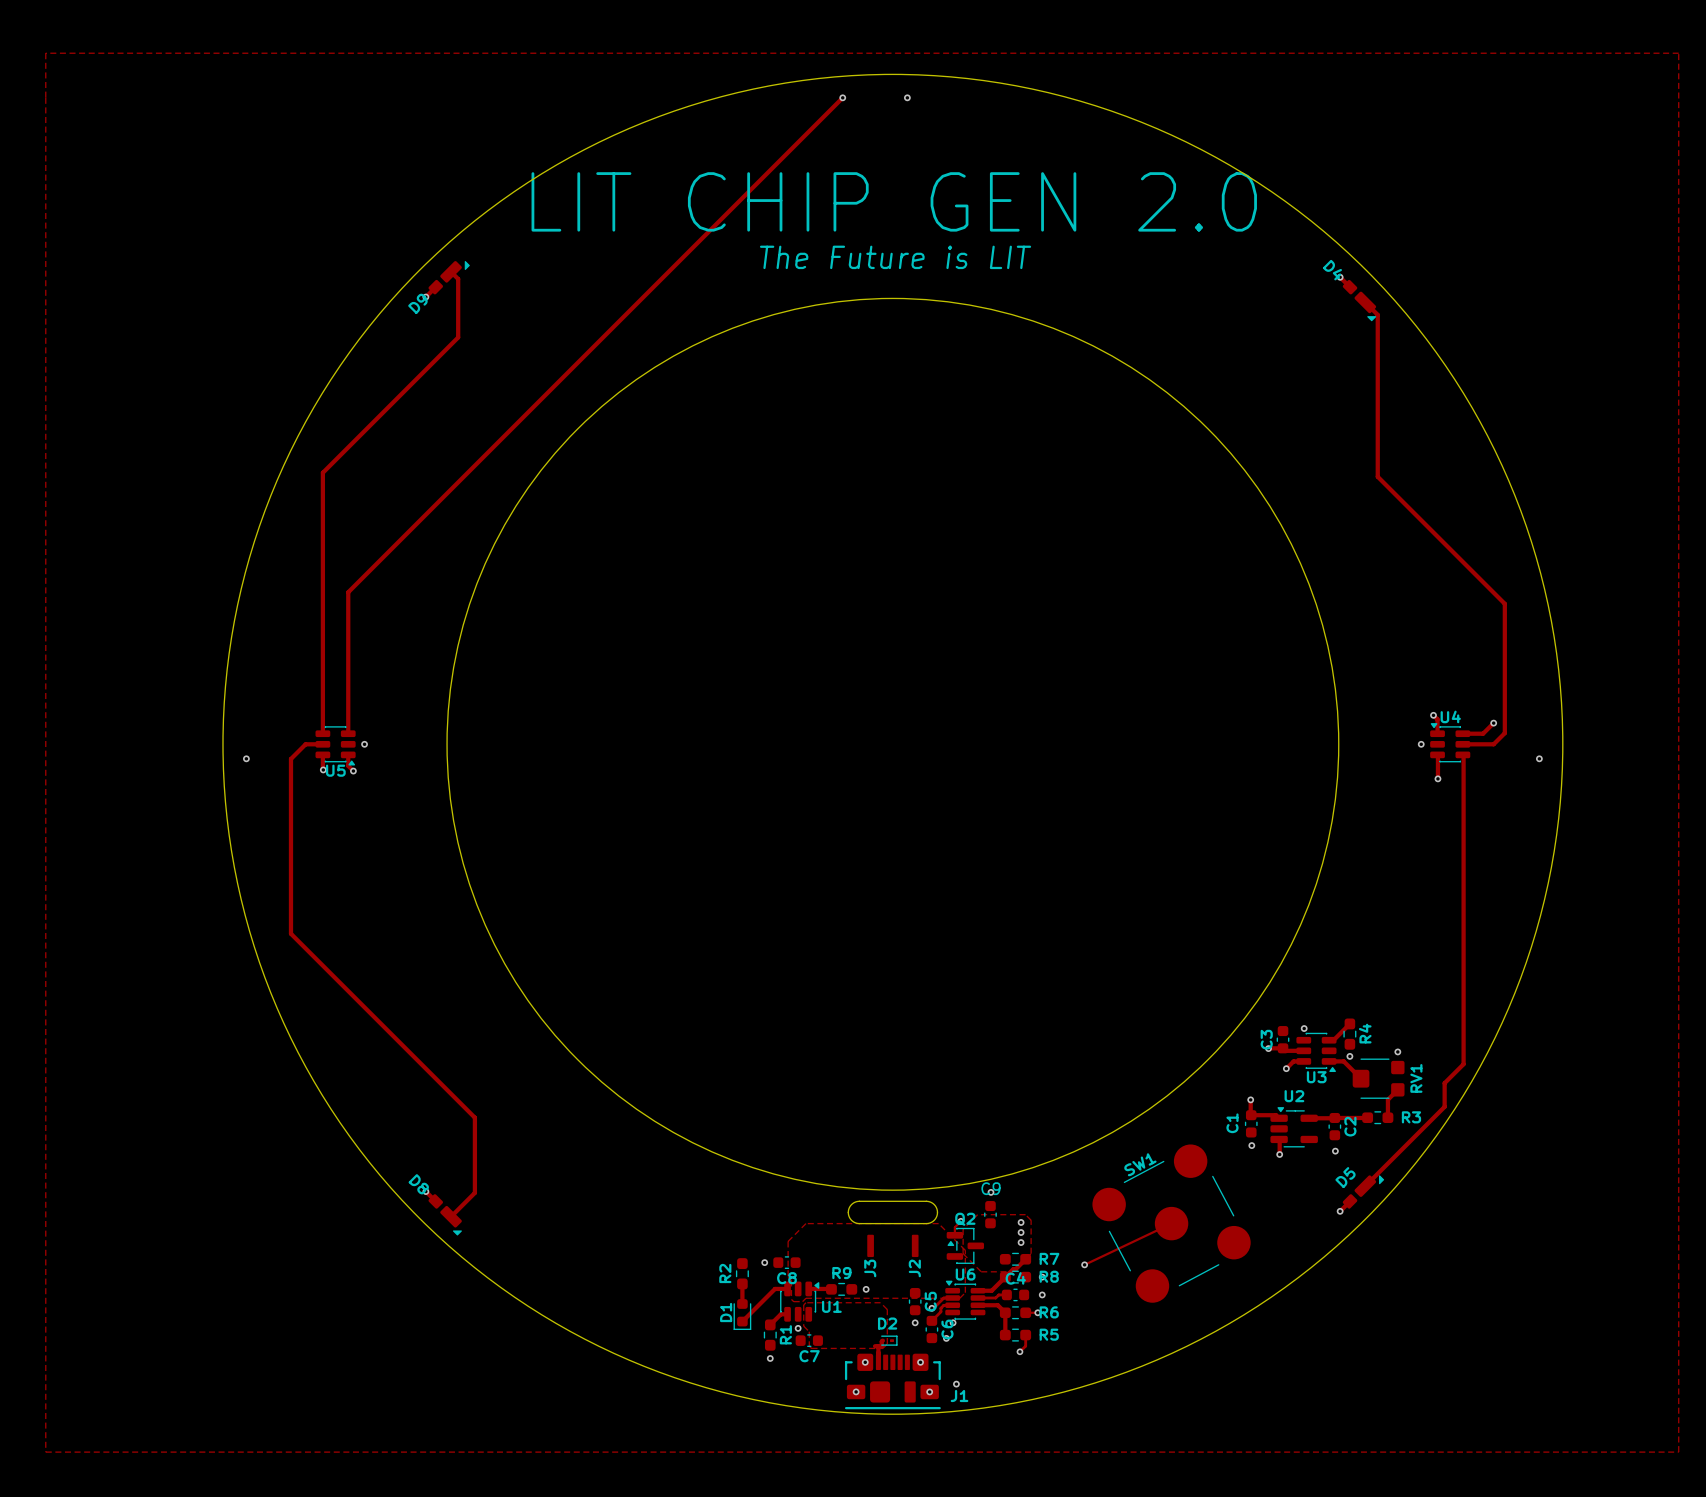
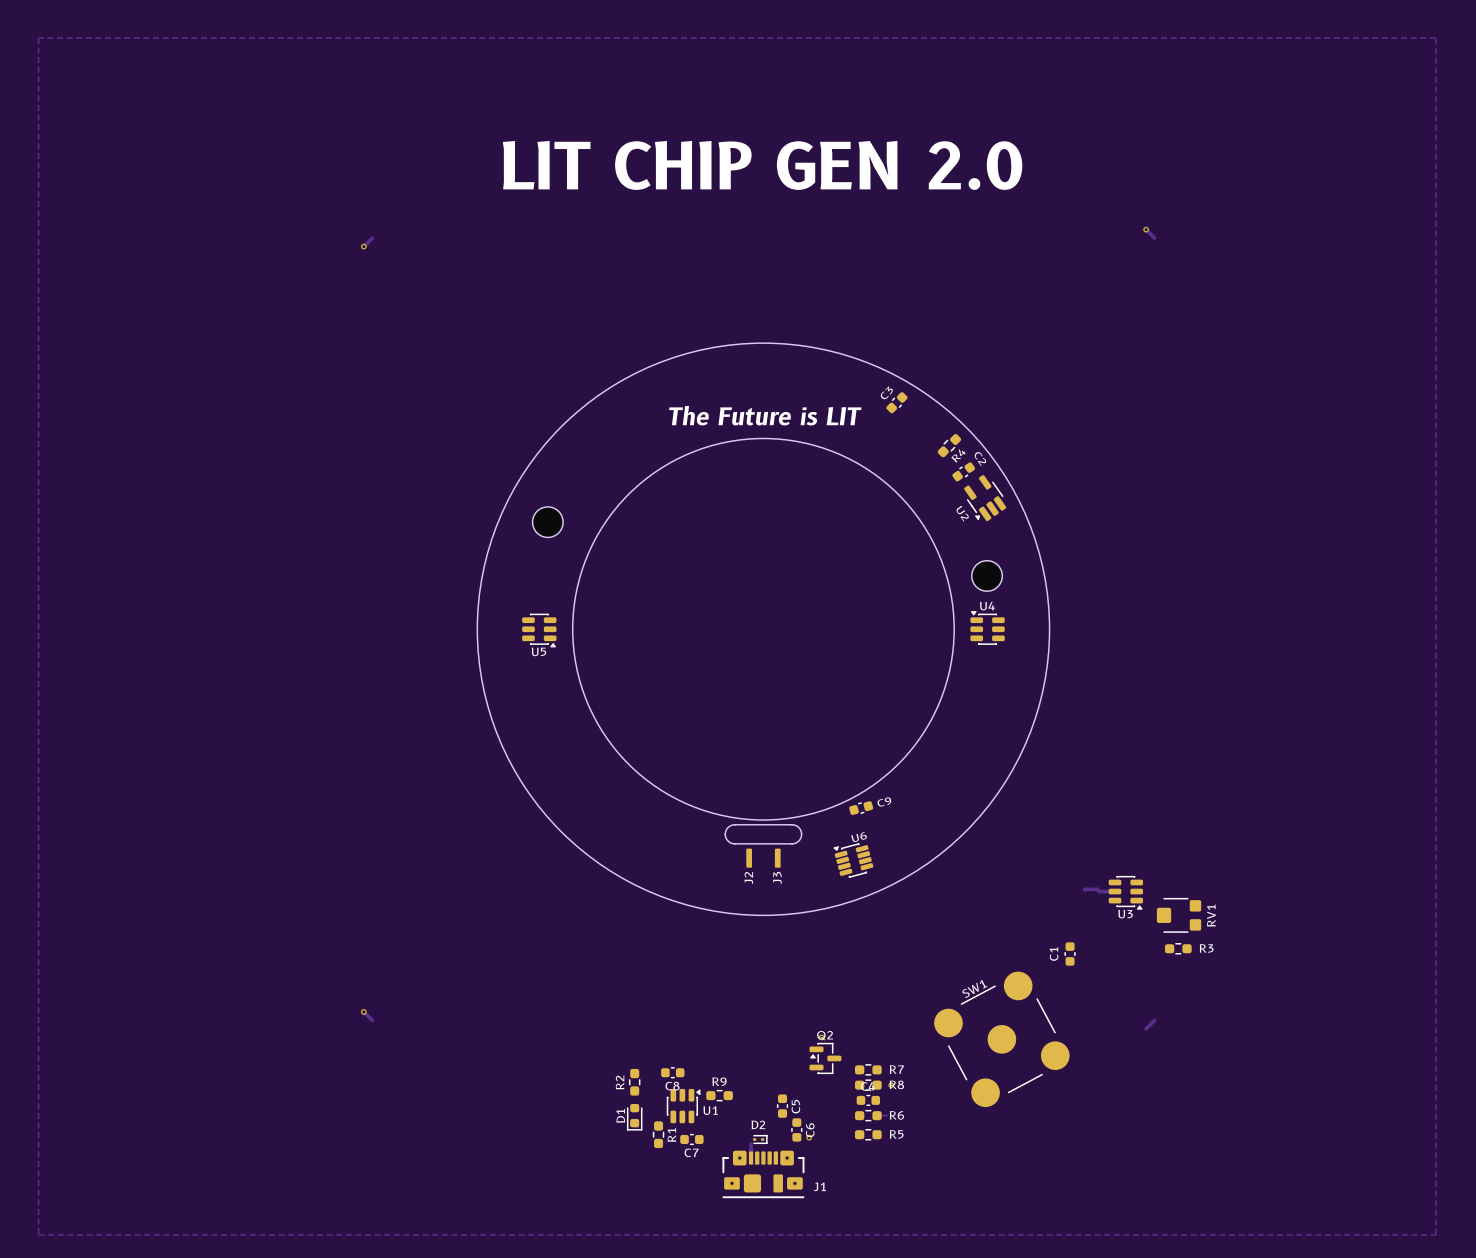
round board edge: [222, 74, 1564, 1415] -> none
track: (842, 97) (348, 592) (348, 733) -> none
via: (842, 97) -> none
via: (907, 97) -> none
text position: The Future is LIT (895, 257) -> The Future is LIT (765, 415)
track: (451, 271) (458, 279) (458, 337) (322, 472) (322, 733) -> none
D9: (449, 277) -> none
round board edge: [446, 298, 1340, 1191] -> none
D4: (1359, 300) -> none
track: (1365, 302) (1377, 314) (1377, 476) (1504, 603) (1504, 733) (1493, 744) (1462, 744) -> none
round board edge: none -> [477, 342, 1050, 916]
round board edge: none -> [572, 438, 955, 821]
part: none -> (547, 522)
part: none -> (987, 575)
track: (1433, 715) (1437, 719) (1437, 733) -> none
via: (1433, 715) -> none
track: (1493, 723) (1483, 733) (1462, 733) -> none
via: (1493, 723) -> none
U4 position: (1450, 742) -> (987, 627)
track: (322, 744) (305, 744) (290, 758) (290, 933) (474, 1117) (474, 1192) (451, 1216) -> none
via: (364, 744) -> none
via: (1421, 744) -> none
U5 position: (335, 745) -> (539, 630)
track: (322, 754) (323, 769) -> none
track: (348, 754) (348, 765) (353, 771) -> none
track: (1437, 754) (1437, 778) -> none
track: (1462, 754) (1463, 1064) (1444, 1083) (1444, 1106) (1365, 1186) -> none
via: (246, 758) -> none
via: (1539, 758) -> none
via: (323, 769) -> none
via: (353, 771) -> none
via: (1437, 778) -> none
track: (1349, 1023) (1333, 1040) (1329, 1040) -> none
via: (1304, 1028) -> none
R4 rotation: 0° (1349, 1034) -> 45° clockwise (949, 445)
R4 position: (1349, 1034) -> (949, 445)
C3 rotation: 0° (1283, 1039) -> 45° clockwise (896, 402)
C3 position: (1283, 1039) -> (896, 402)
via: (1268, 1048) -> none
via: (1397, 1051) -> none
via: (1349, 1056) -> none
track: (1303, 1061) (1293, 1061) (1286, 1068) -> none
track: (1329, 1061) (1343, 1061) (1361, 1078) -> none
via: (1286, 1068) -> none
track: (1397, 1089) (1387, 1099) (1387, 1117) -> none
track: (1250, 1099) (1251, 1115) (1276, 1115) (1279, 1118) -> none
via: (1250, 1099) -> none
track: (1367, 1117) (1309, 1118) -> none
C2 rotation: 0° (1334, 1126) -> 55° clockwise (963, 471)
C2 position: (1334, 1126) -> (963, 471)
U2 rotation: 0° (1294, 1127) -> 125° counterclockwise (985, 498)
U2 position: (1294, 1127) -> (985, 498)
track: (1279, 1139) (1279, 1154) -> none
via: (1251, 1145) -> none
via: (1335, 1151) -> none
via: (1279, 1154) -> none
via: (990, 1192) -> none
D5: (1363, 1192) -> none
board edge: (859, 1201) (927, 1201) (935, 1205) (937, 1213) (934, 1220) (927, 1223) (858, 1223) (850, 1219) (848, 1211) (851, 1204) (859, 1201) -> (734, 824) (793, 824) (799, 828) (801, 835) (798, 841) (793, 843) (733, 843) (727, 840) (725, 833) (728, 827) (734, 824)
via: (1340, 1211) -> none
D8: (445, 1214) -> none
zone outline: (977, 1214) (963, 1229) (963, 1253) (981, 1271) (1013, 1271) (1031, 1253) (1031, 1220) (1025, 1214) (977, 1214) -> none
C9 rotation: 0° (990, 1214) -> 75° clockwise (861, 808)
C9 position: (990, 1214) -> (861, 808)
track: (960, 1221) (954, 1227) (954, 1235) -> none
via: (1021, 1222) -> none
zone outline: (805, 1223) (938, 1223) (965, 1250) (965, 1292) (959, 1298) (805, 1298) (802, 1301) (793, 1301) (791, 1299) (791, 1280) (788, 1277) (788, 1241) (805, 1223) -> none
track: (1171, 1223) (1084, 1264) -> none
via: (1021, 1232) -> none
via: (1021, 1242) -> none
J3 position: (870, 1245) -> (777, 858)
J2 position: (915, 1245) -> (749, 858)
track: (1025, 1259) (991, 1290) (978, 1290) -> none
via: (764, 1262) -> none
via: (1084, 1264) -> none
track: (742, 1283) (742, 1303) -> none
track: (787, 1288) (775, 1288) (742, 1321) -> none
track: (808, 1288) (831, 1289) -> none
via: (866, 1289) -> none
track: (1006, 1294) (998, 1294) (995, 1298) (978, 1298) -> none
via: (1042, 1294) -> none
track: (952, 1298) (943, 1298) (931, 1308) -> none
U6 rotation: 0° (965, 1300) -> 15° counterclockwise (853, 860)
U6 position: (965, 1300) -> (853, 860)
zone outline: (805, 1302) (880, 1302) (887, 1309) (887, 1343) (882, 1348) (811, 1348) (809, 1346) (809, 1331) (803, 1326) (803, 1304) (805, 1302) -> none
track: (947, 1305) (943, 1305) (940, 1311) (931, 1320) -> none
track: (978, 1305) (997, 1305) (1005, 1312) (1005, 1335) -> none
via: (931, 1308) -> none
via: (1037, 1312) -> none
track: (787, 1314) (780, 1314) (770, 1324) -> none
via: (915, 1322) -> none
via: (953, 1322) -> none
via: (798, 1328) -> none
track: (1025, 1335) (1025, 1346) (1019, 1351) -> none
track: (882, 1340) (881, 1346) (875, 1346) -> none
via: (1019, 1351) -> none
via: (770, 1358) -> none
via: (956, 1384) -> none

